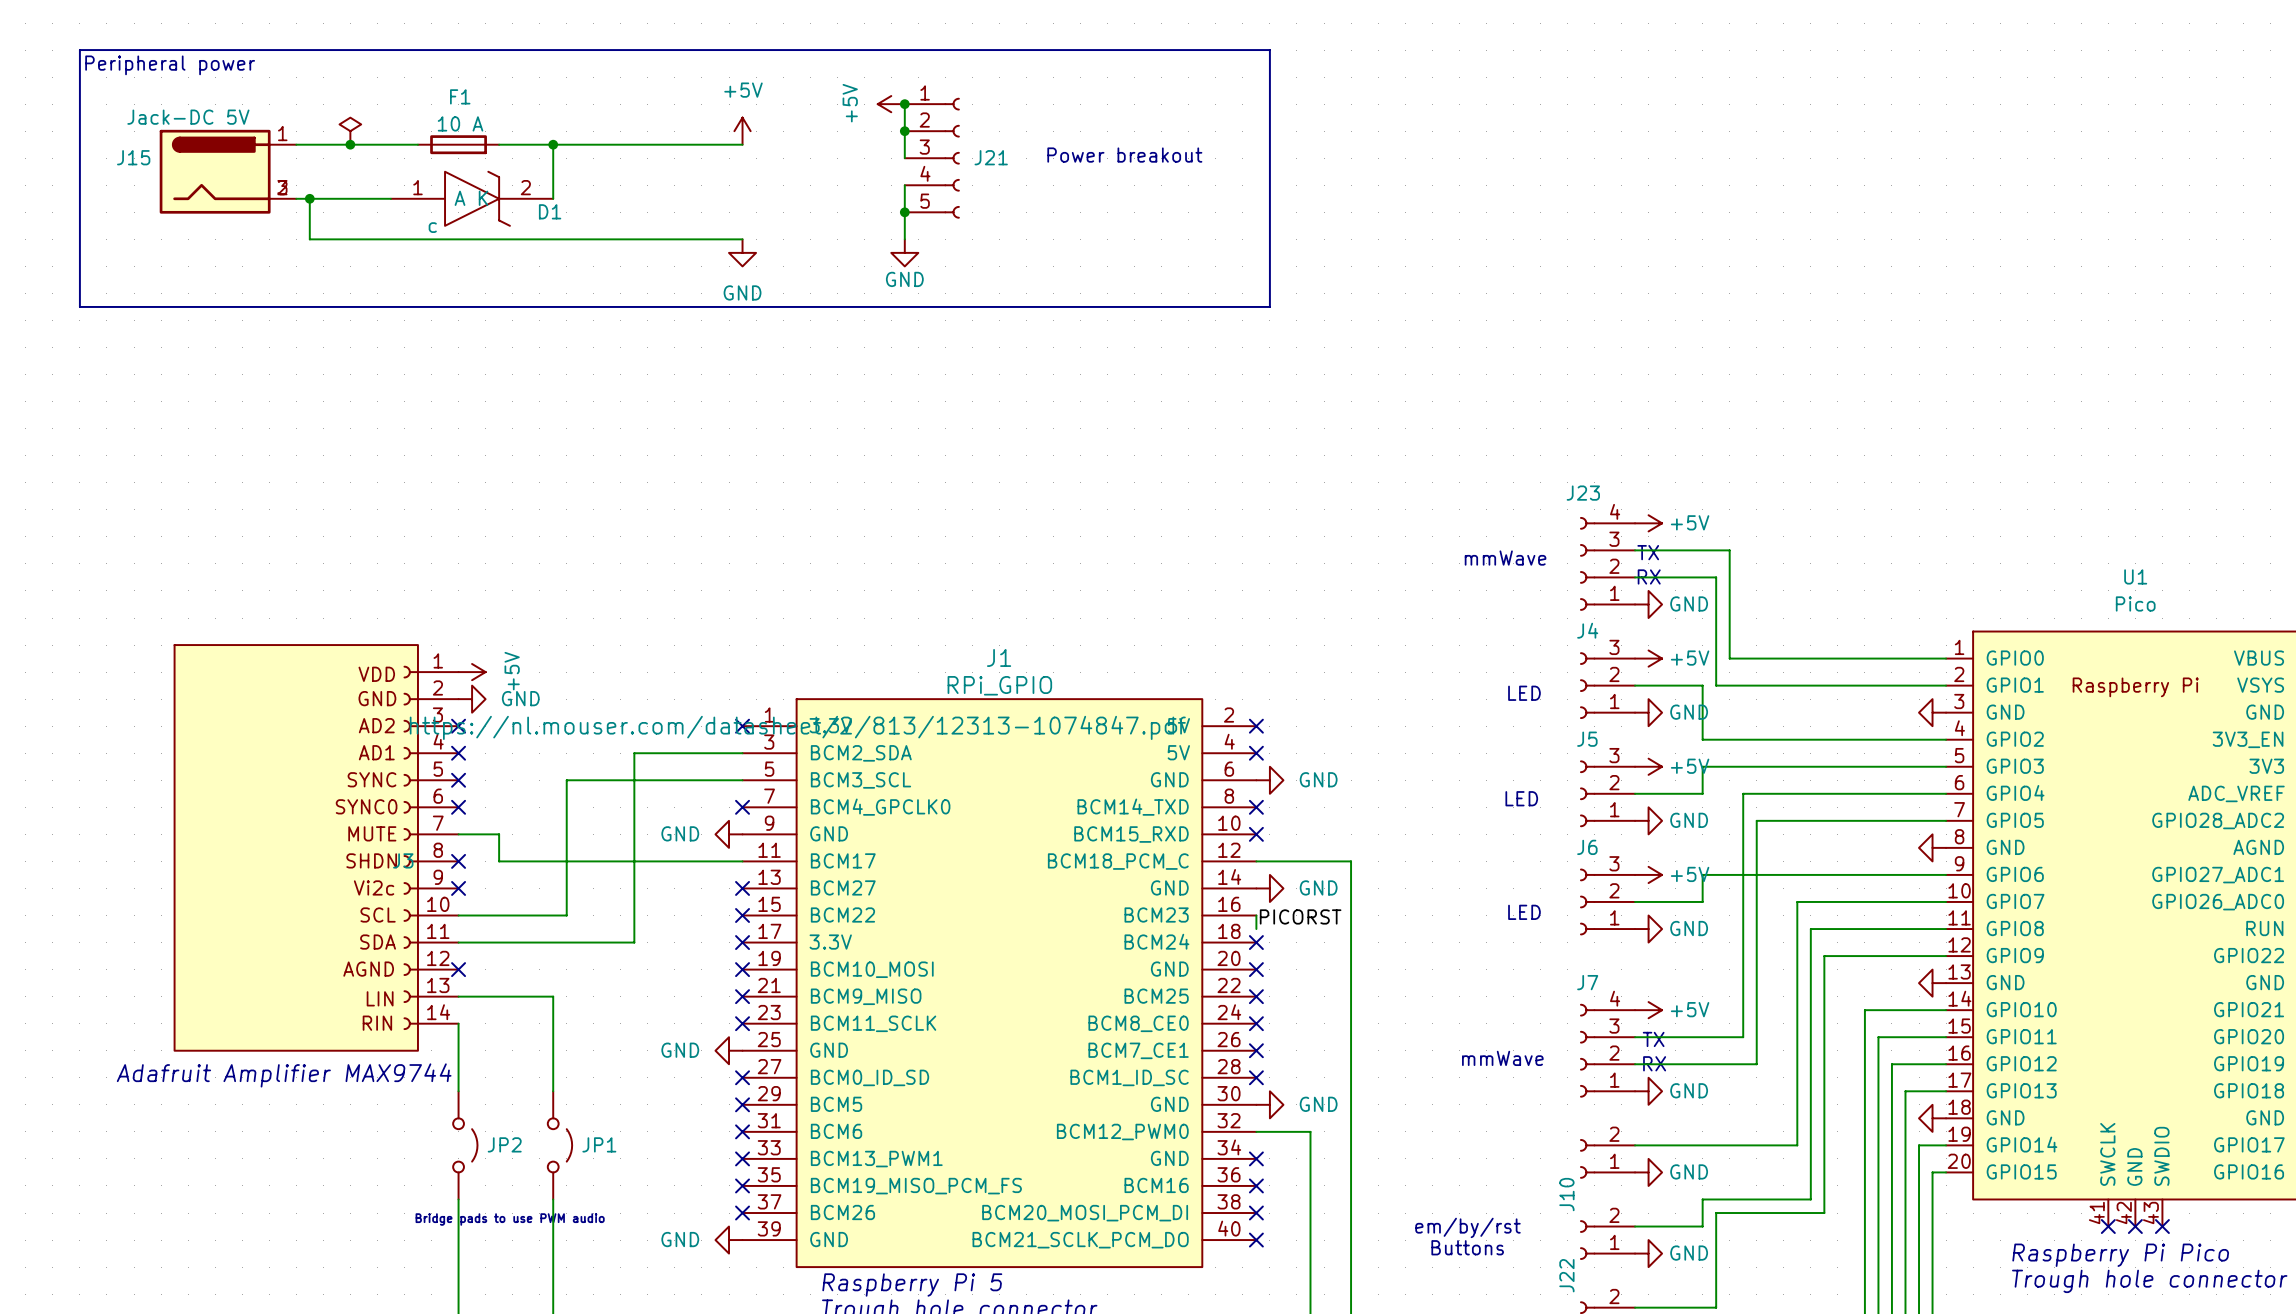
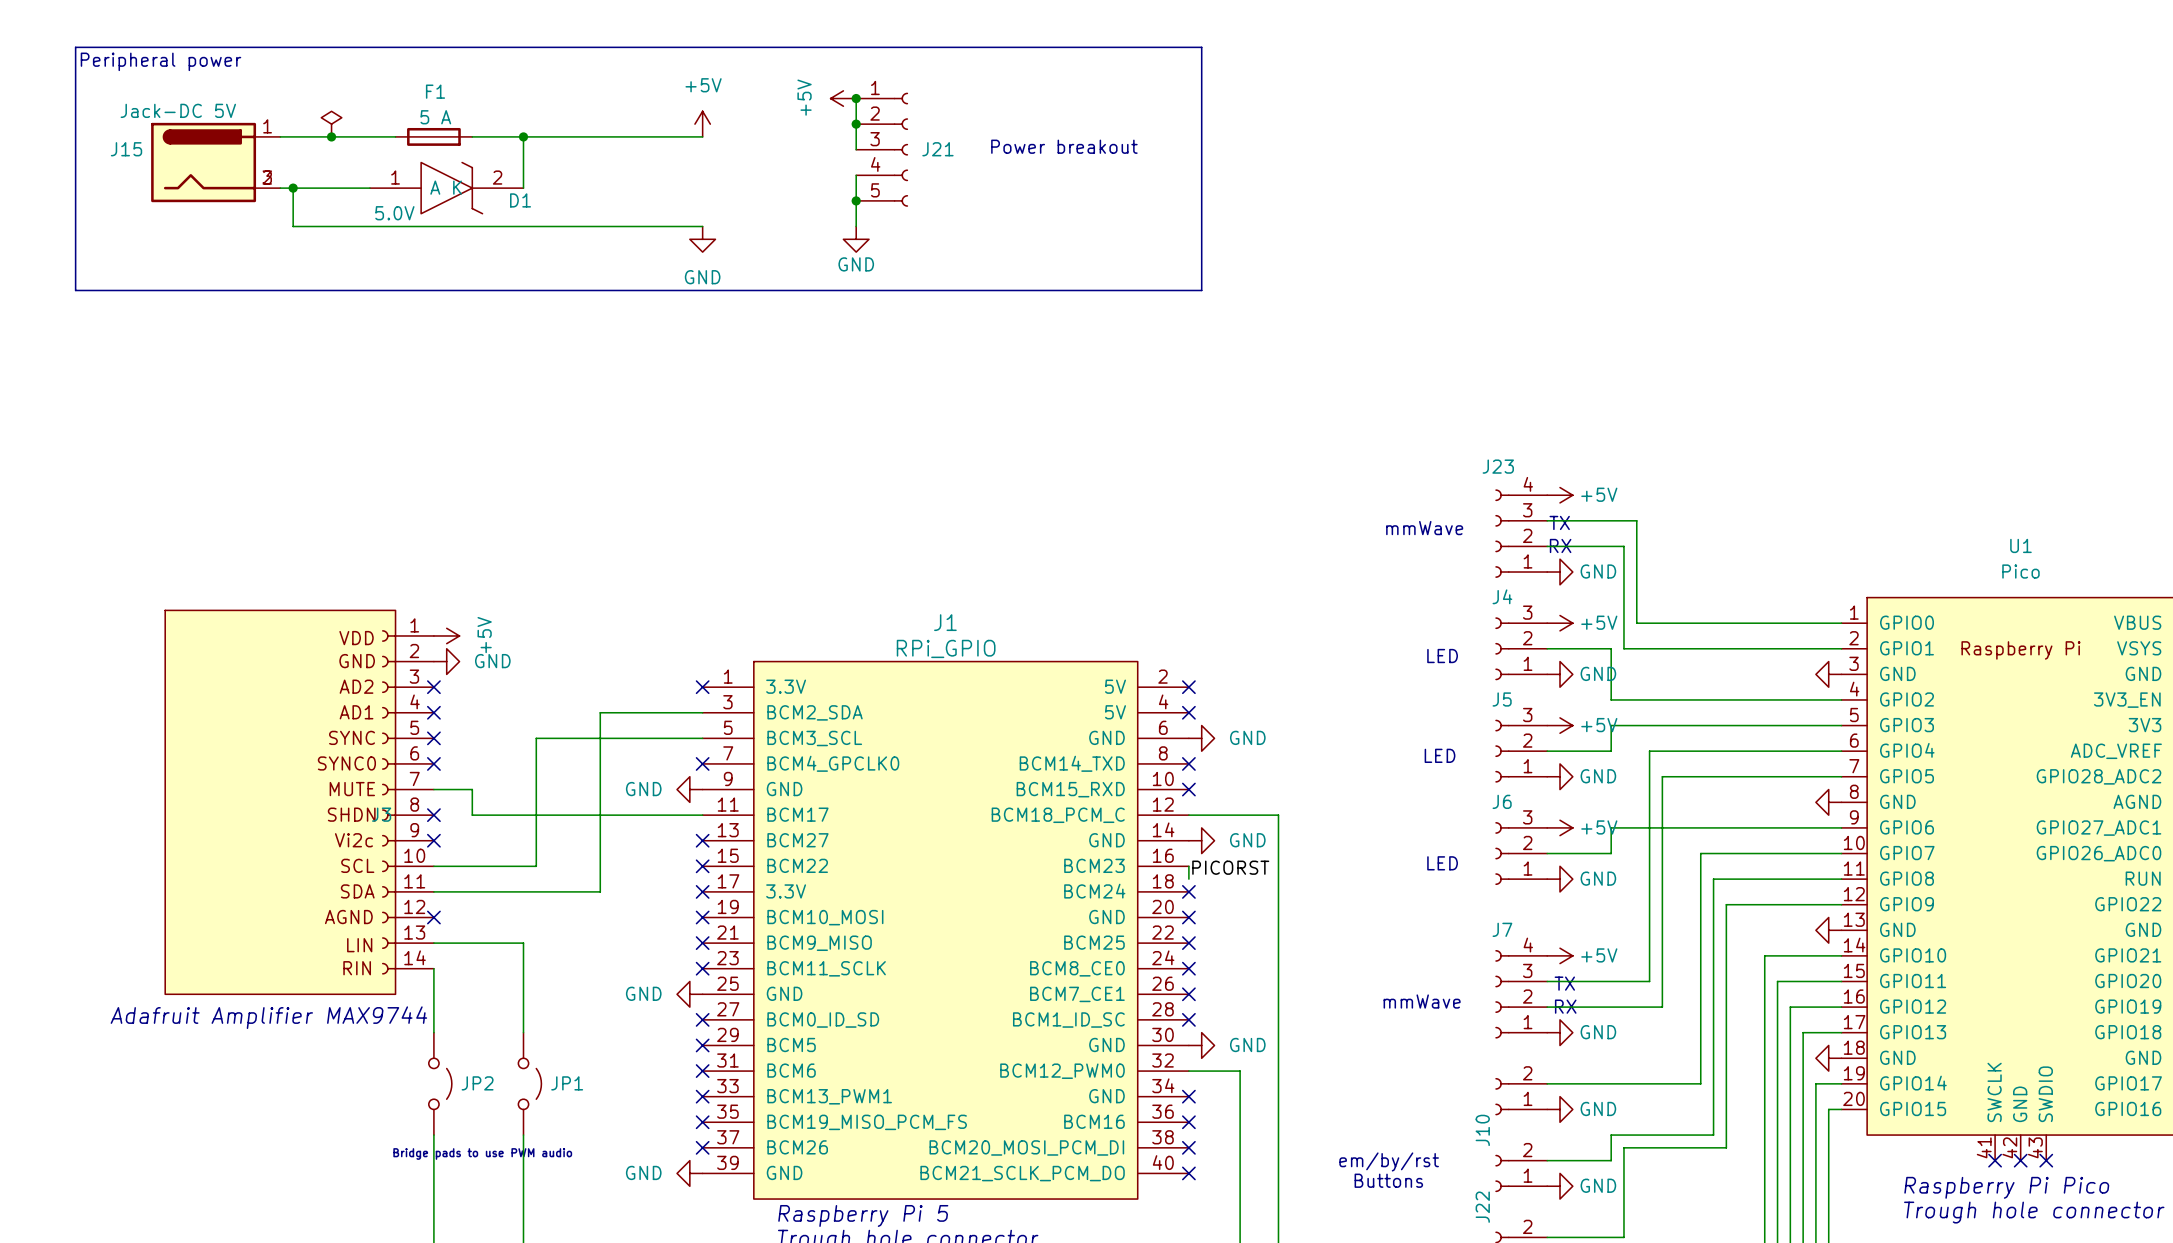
F1 value: 10 A (460, 123) -> 5 A (435, 117)
D1 value: c (432, 227) -> 5.0V (394, 213)
J1 text: https://nl.mouser.com/datasheet/2/813/12313-1074847.pdf (797, 727) -> none

